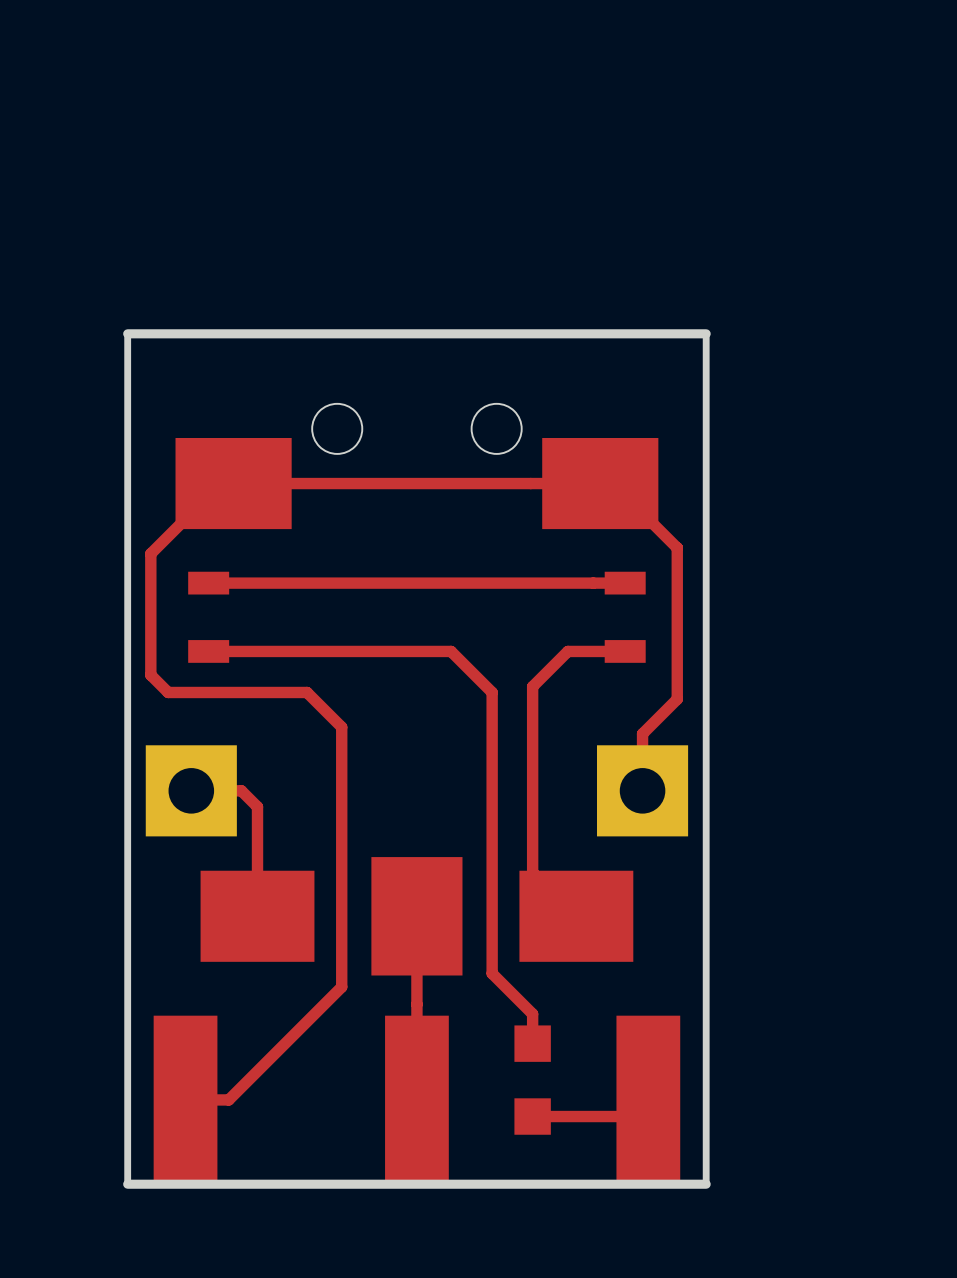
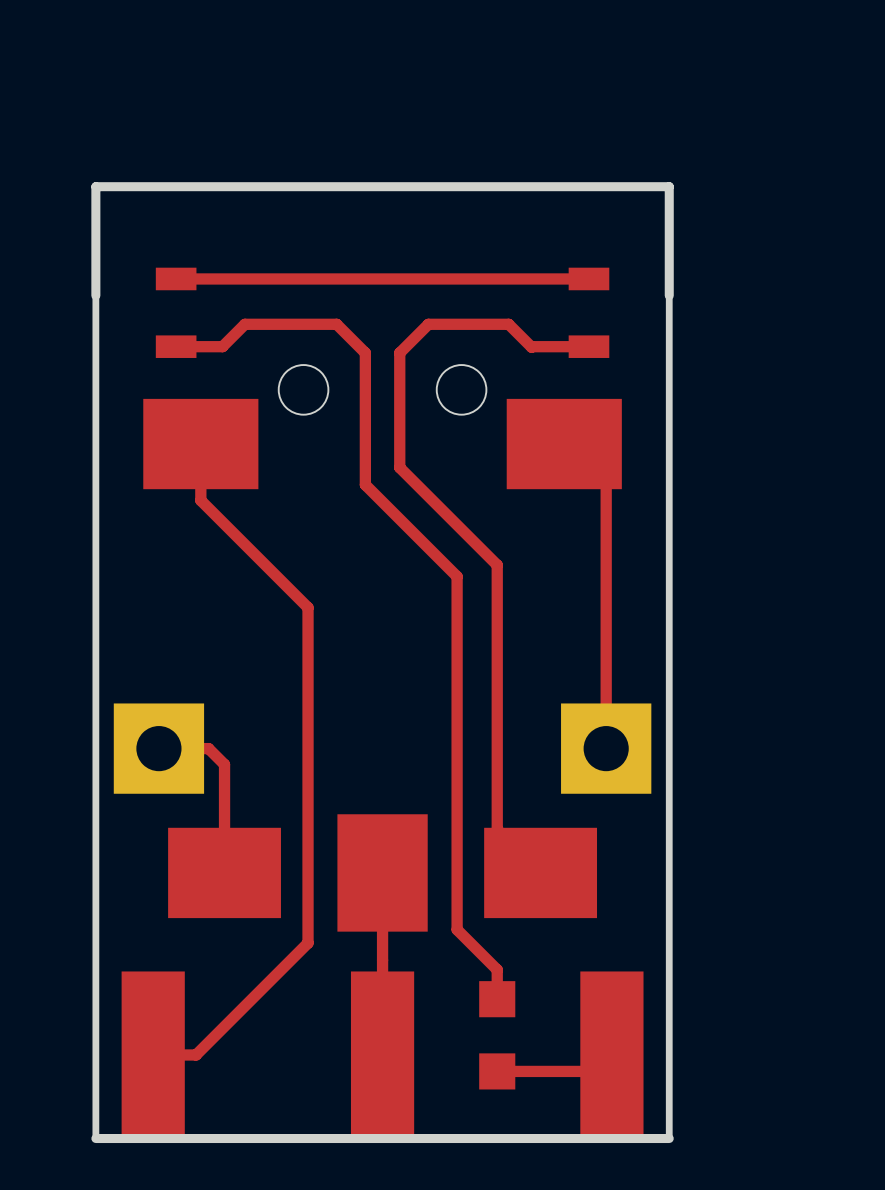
board edge: (706, 333) (127, 333) -> (669, 295) (669, 186) (95, 186) (95, 295)
part: none -> (176, 312)
part: none -> (588, 312)
top track: none -> (588, 346) (532, 346)
top track: (677, 547) (677, 699) (642, 733) -> (564, 444) (606, 485) (606, 692)
top track: (677, 547) (612, 483) (221, 483) (150, 553) (150, 675) (168, 692) (307, 692) (341, 727) -> (200, 444) (200, 500) (308, 607) (308, 685)
top track: (625, 583) (208, 583) -> (588, 278) (176, 278)
part: (208, 617) -> none
part: (625, 617) -> none
top track: (208, 651) (451, 651) (492, 692) -> (176, 346) (222, 346) (244, 324) (336, 324) (365, 352) (365, 484) (457, 576) (457, 651)
top track: (625, 651) (567, 651) (532, 686) -> (531, 347) (508, 324) (428, 324) (399, 352) (399, 467) (497, 565) (497, 645)

